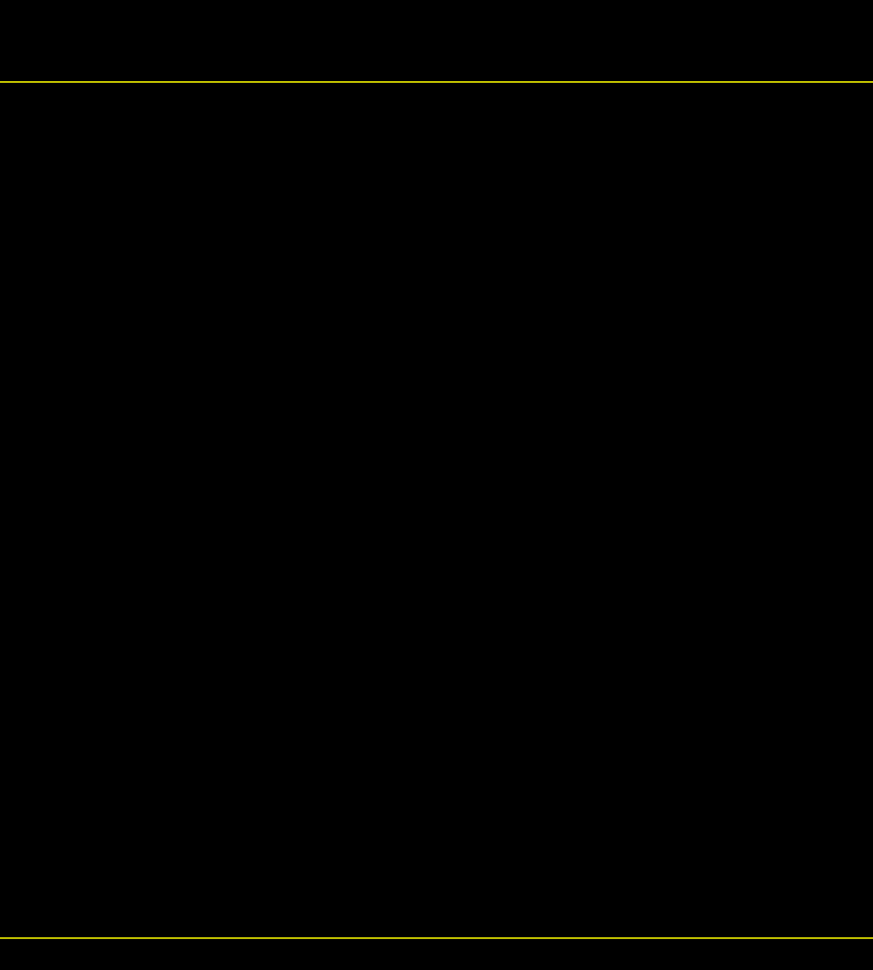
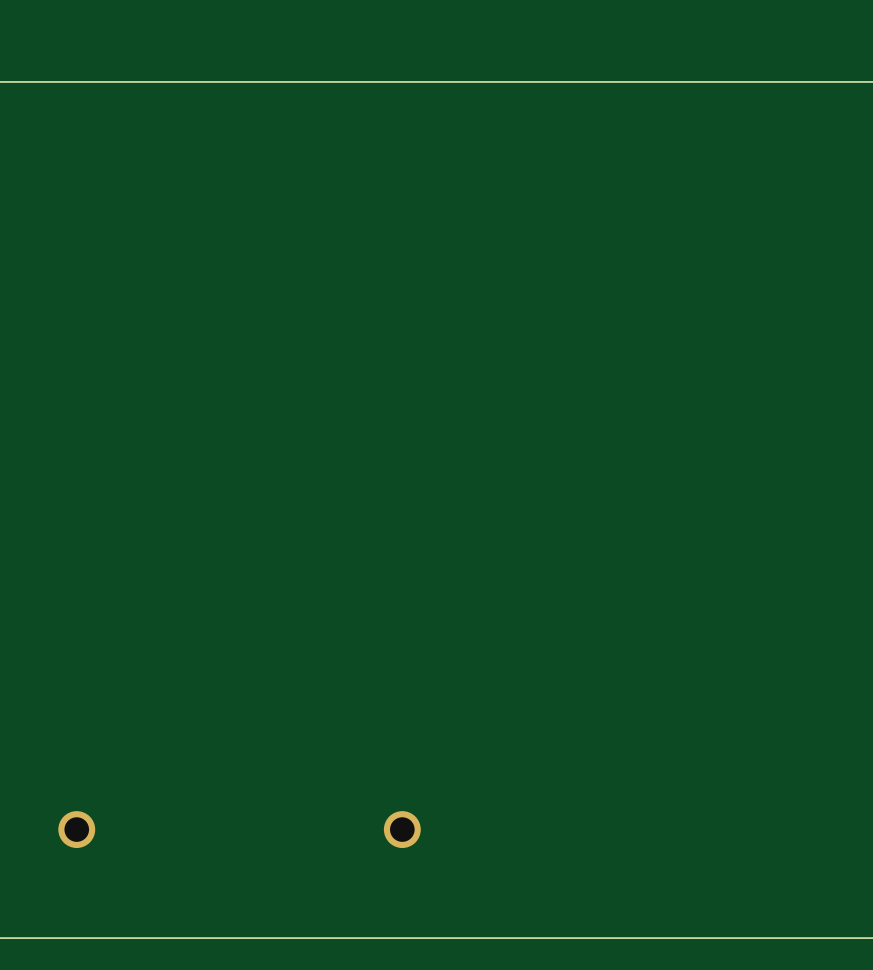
part: none -> (76, 829)
part: none -> (402, 829)

